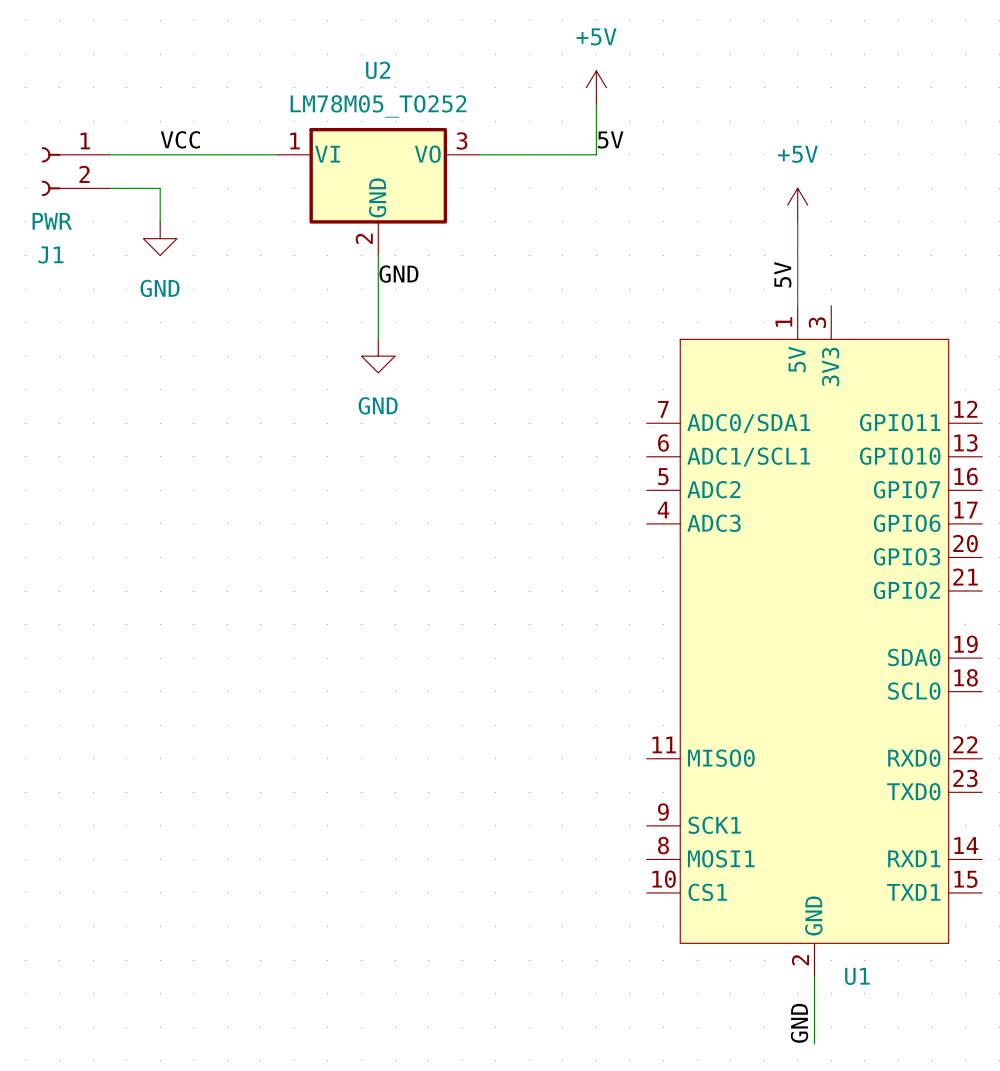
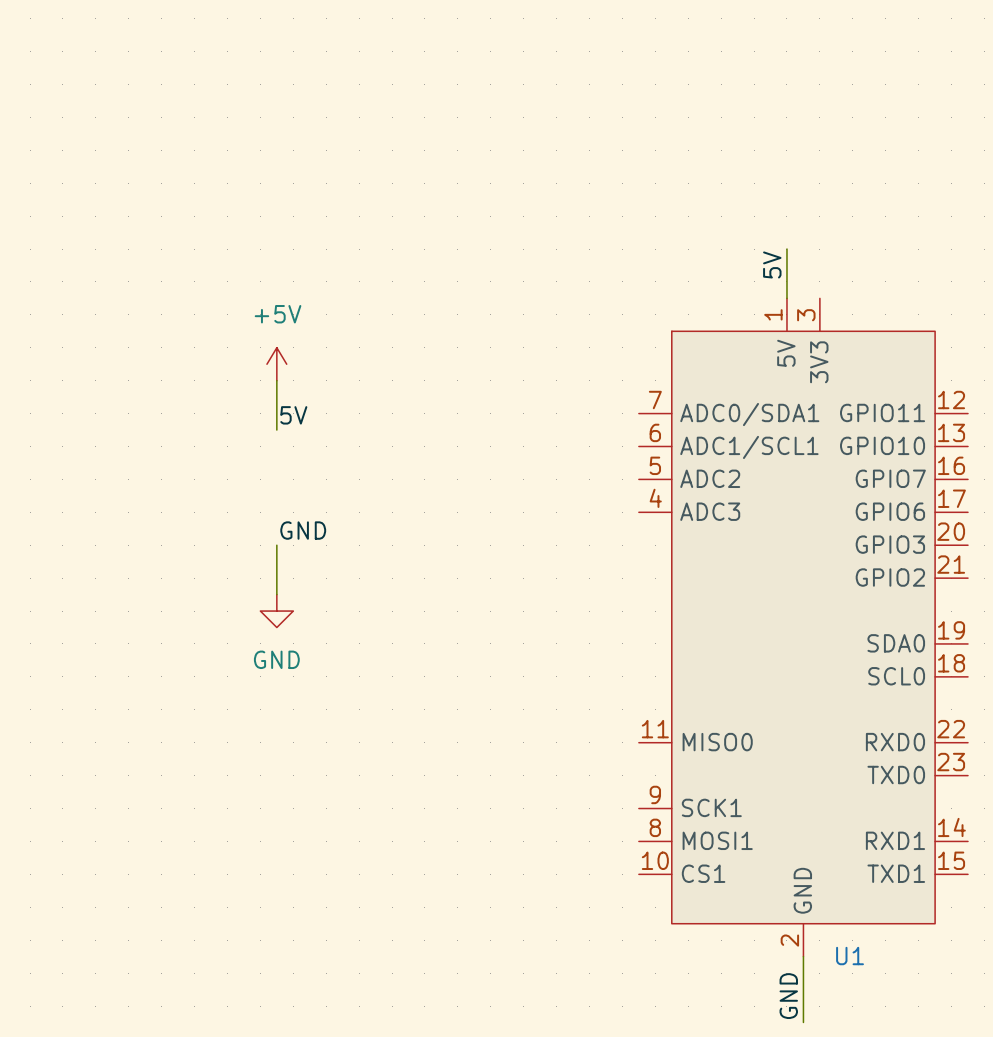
power symbol: +5V (596, 87) -> none
wire: (596, 104) (596, 154) (478, 154) -> none
label: VCC (180, 139) -> none
label: 5V (610, 140) -> none
wire: (109, 154) (277, 154) -> none
J1: PWR (75, 171) -> none
wire: (109, 188) (160, 188) (160, 221) -> none
U2: LM78M05_TO252 (378, 191) -> none
power symbol: +5V (797, 205) -> none
wire: (797, 221) (797, 255) -> none
power symbol: GND (160, 238) -> none
wire: (378, 255) (378, 339) -> none
label position: GND (398, 274) -> GND (303, 530)
power symbol: GND (378, 356) -> none
power symbol: none -> +5V (276, 364)
wire: none -> (276, 380) (276, 430)
label: none -> 5V (293, 415)
wire: none -> (276, 545) (276, 594)
power symbol: none -> GND (276, 611)

